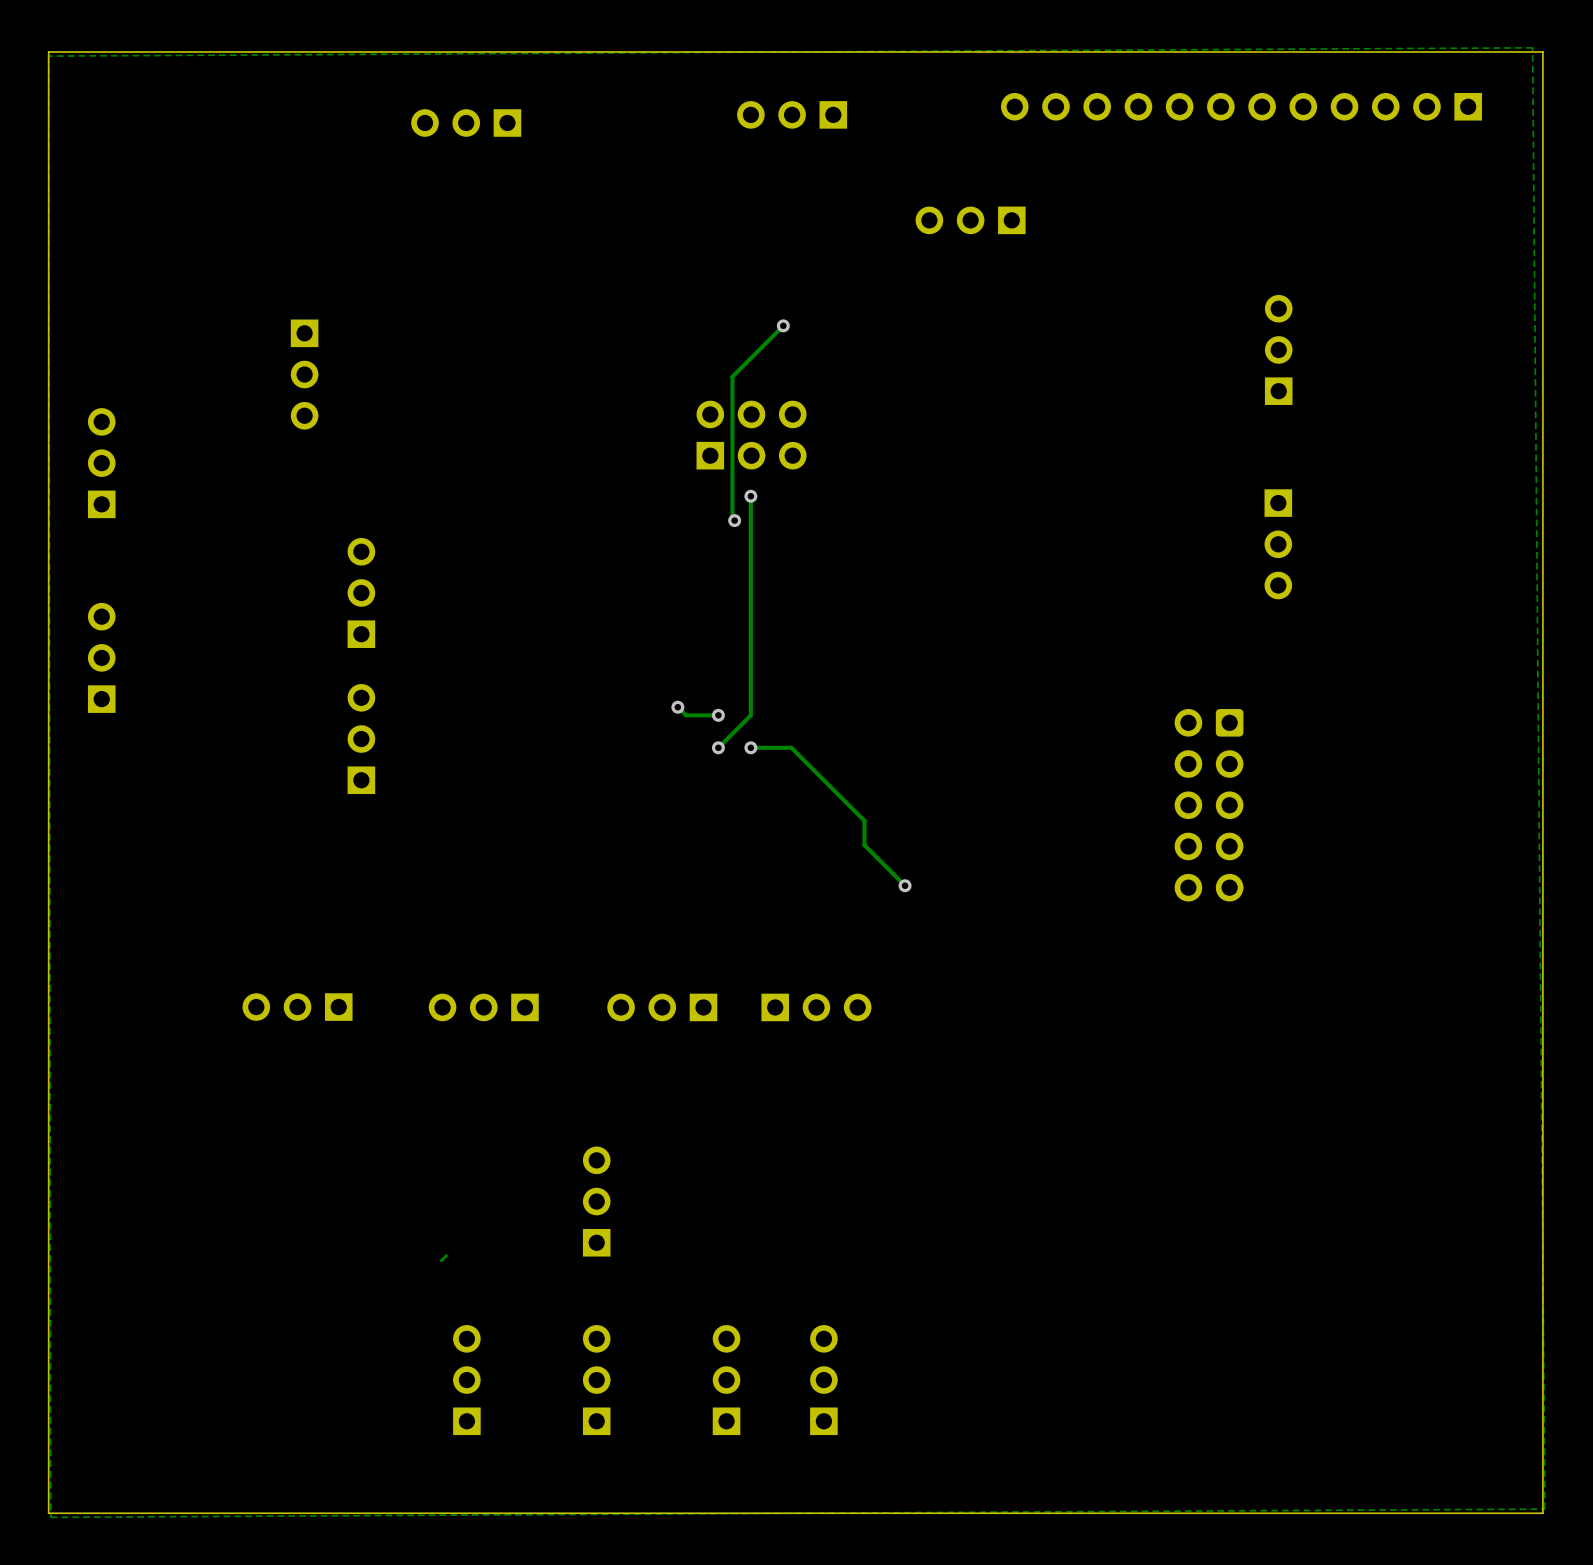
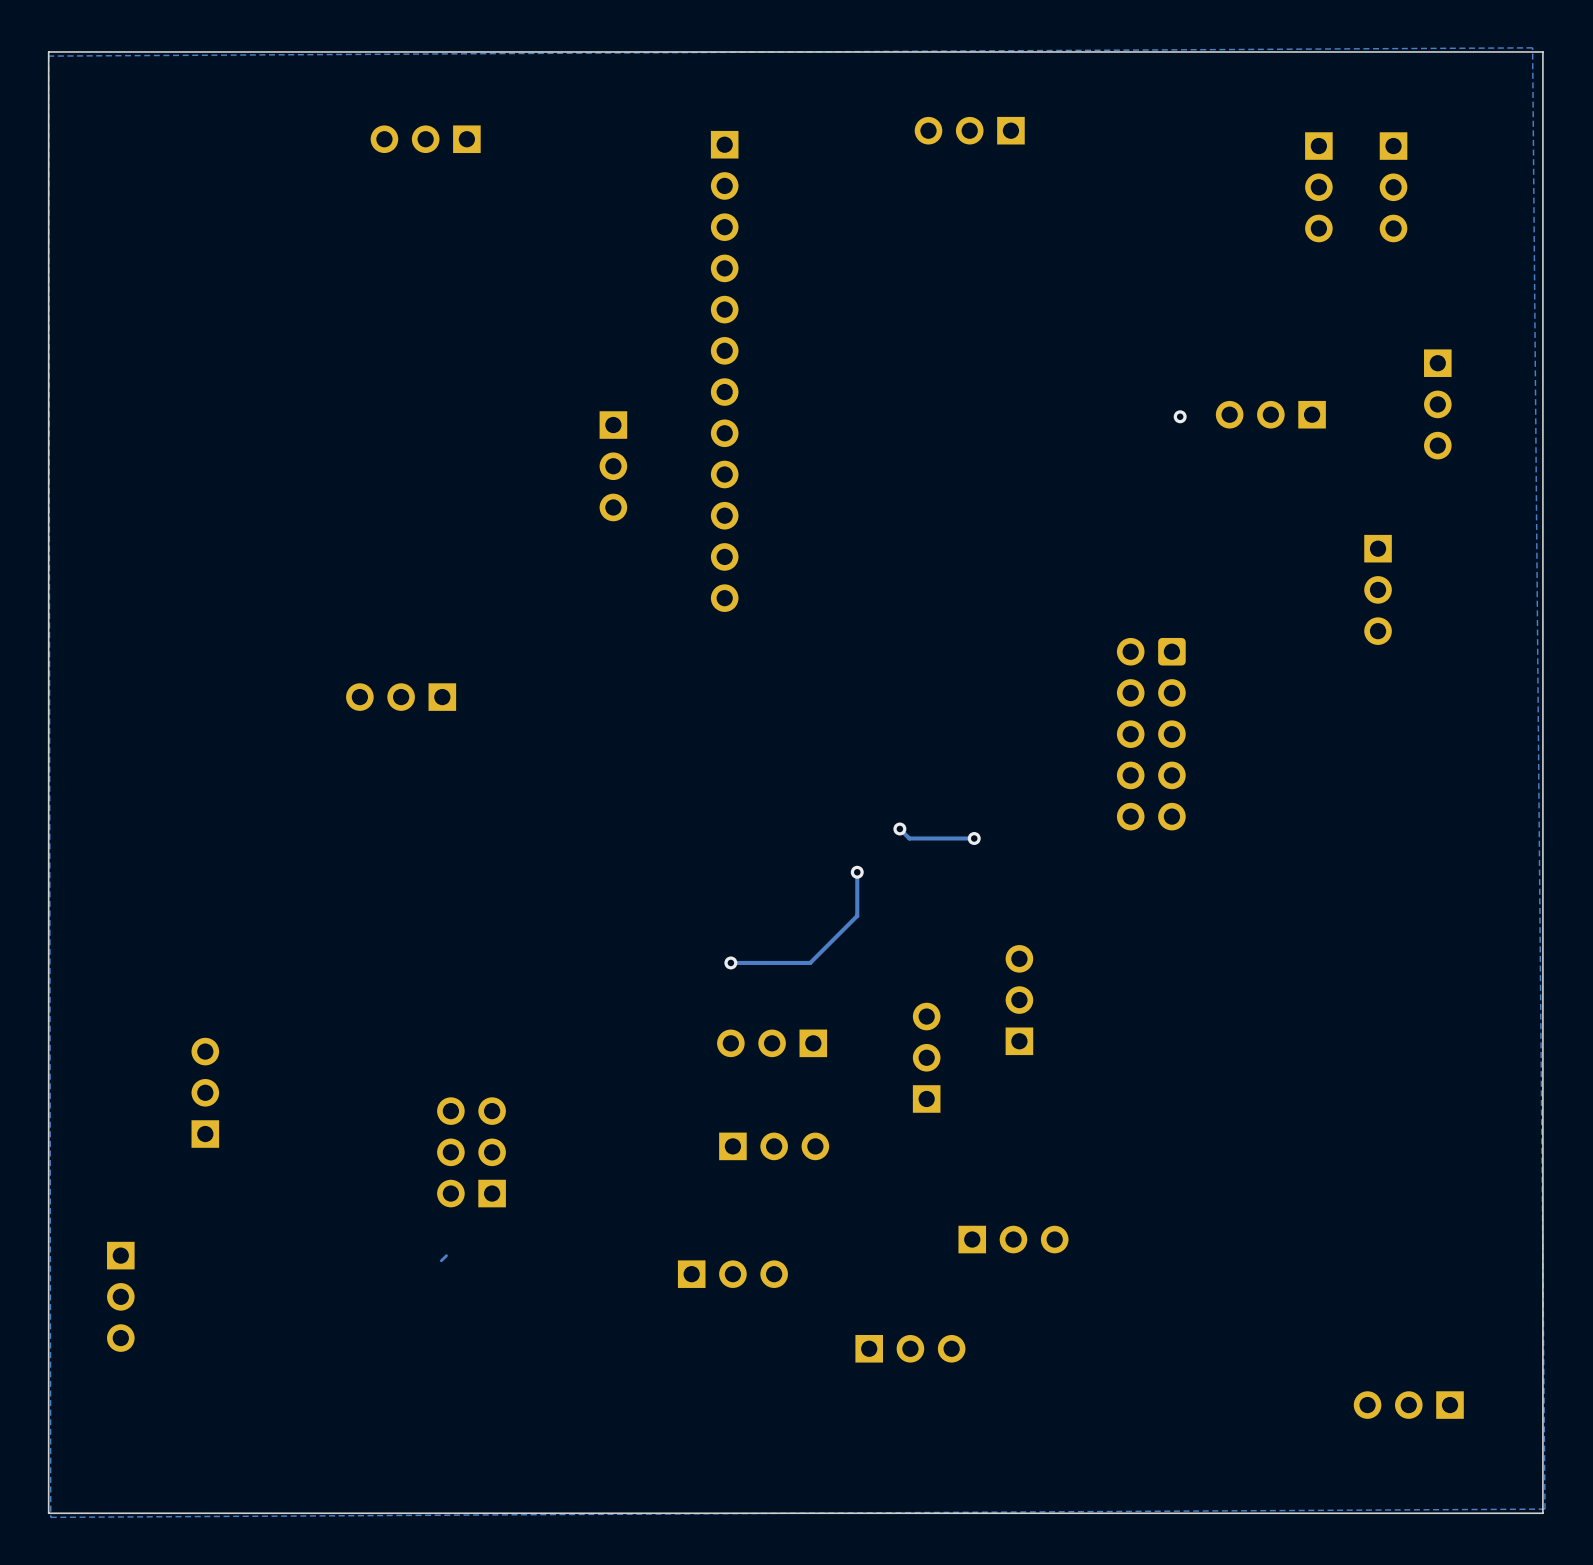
part: (1241, 106) -> none
part: (792, 114) -> none
part position: (466, 122) -> (425, 139)
part: none -> (969, 130)
part: none -> (1318, 187)
part: none -> (1393, 187)
part: (970, 220) -> none
track: (783, 325) (732, 376) (732, 518) (734, 520) -> none
via: (783, 325) -> none
part: (1278, 349) -> none
part: none -> (724, 371)
part: (304, 374) -> none
part: none -> (1437, 404)
part: none -> (1270, 414)
via: none -> (1180, 416)
part: (751, 435) -> none
part: (101, 463) -> none
part: none -> (613, 466)
track: (750, 496) (750, 715) (718, 747) -> none
via: (750, 496) -> none
via: (734, 520) -> none
part: (1278, 544) -> none
part: none -> (1378, 589)
part: (361, 592) -> none
part: (101, 657) -> none
part: none -> (401, 697)
track: (677, 707) (685, 715) (718, 715) -> none
via: (677, 707) -> none
via: (718, 715) -> none
part: (361, 739) -> none
via: (718, 747) -> none
track: (750, 747) (791, 747) (864, 820) (864, 845) (905, 885) -> none
via: (750, 747) -> none
part position: (1209, 805) -> (1151, 734)
track: none -> (899, 828) (909, 838) (974, 838)
via: none -> (899, 828)
via: none -> (974, 838)
track: none -> (857, 872) (857, 915) (810, 962) (730, 962)
via: none -> (857, 872)
via: (905, 885) -> none
via: none -> (730, 962)
part: none -> (1019, 1000)
part rotation: 0° (297, 1007) -> 90° clockwise (205, 1092)
part position: (297, 1007) -> (205, 1092)
part: (483, 1007) -> none
part: (662, 1007) -> none
part rotation: 0° (816, 1007) -> 180° (772, 1043)
part: none -> (926, 1057)
part: none -> (774, 1146)
part: none -> (471, 1152)
part: (596, 1201) -> none
part: none -> (1013, 1239)
part: none -> (732, 1274)
part: none -> (120, 1296)
part: none -> (910, 1348)
part: (466, 1380) -> none
part: (596, 1380) -> none
part: (726, 1380) -> none
part: (823, 1380) -> none
part: none -> (1408, 1405)

